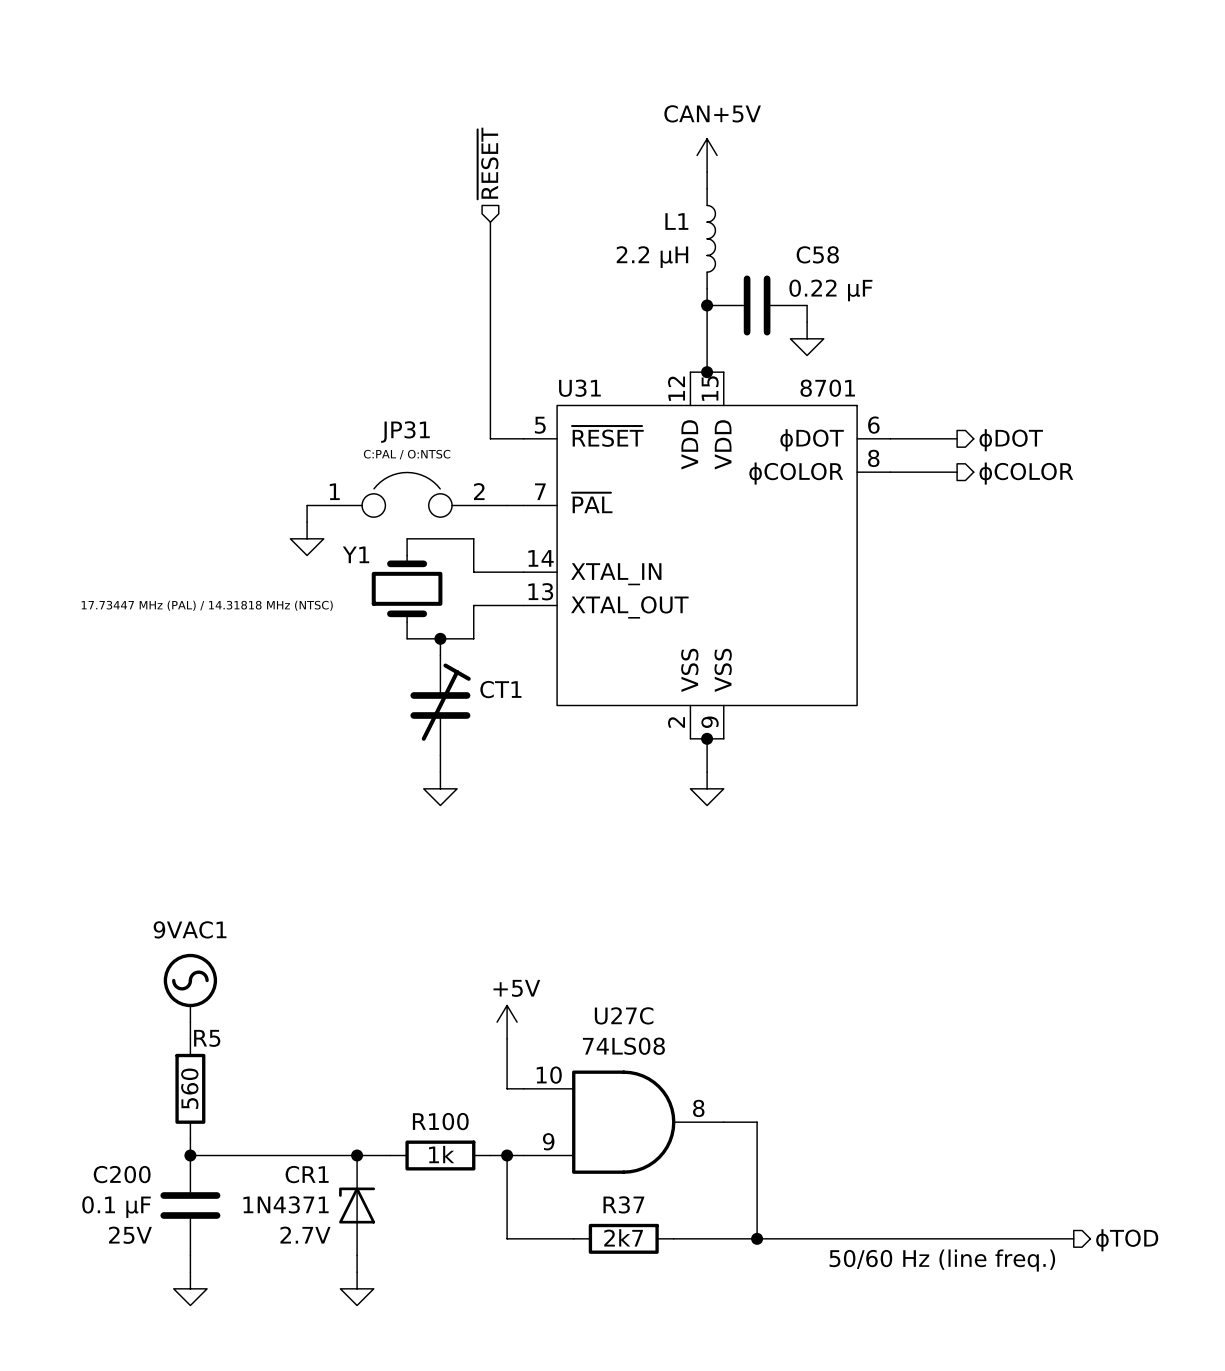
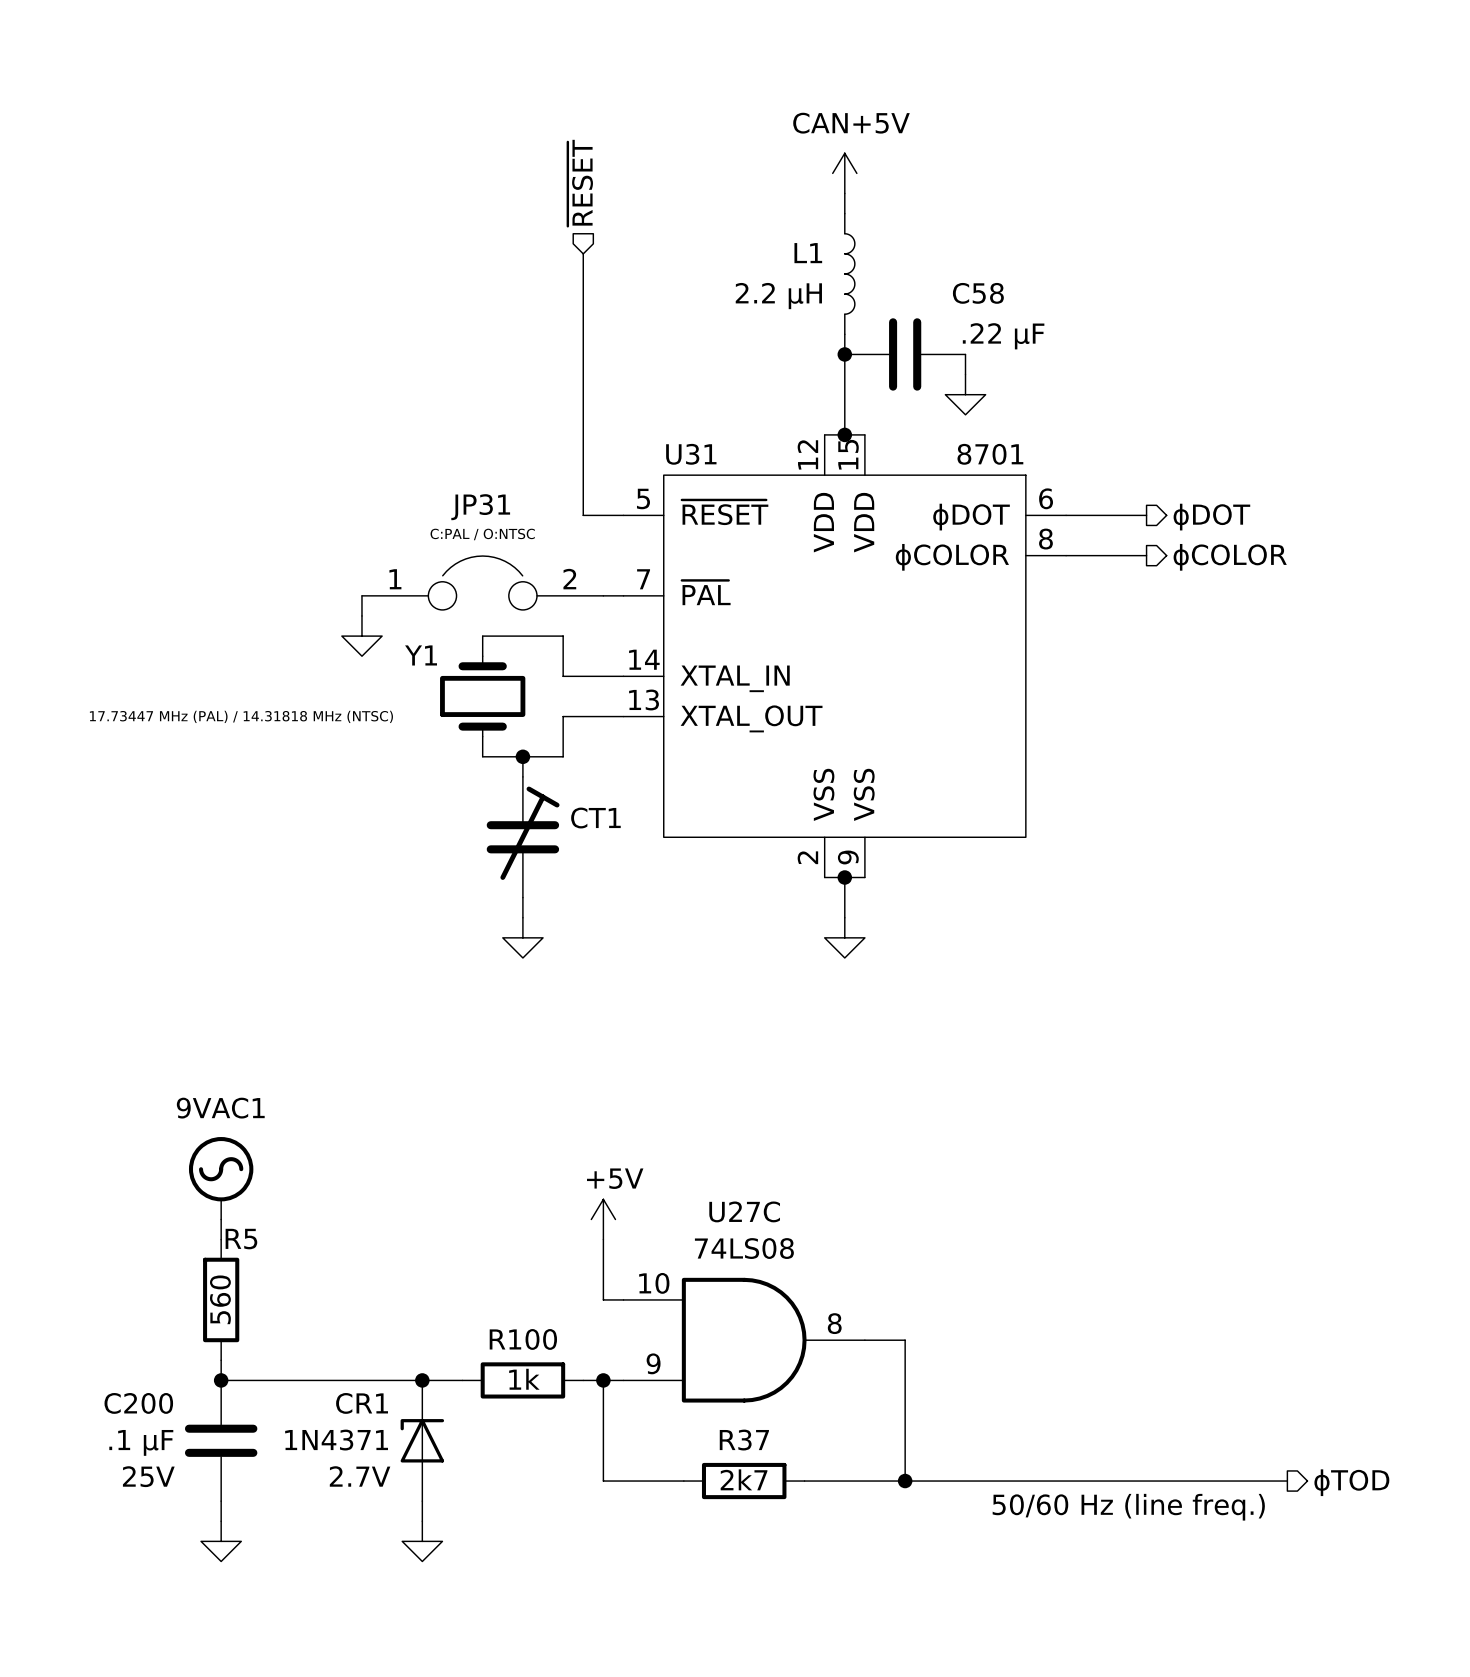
C58 value: 0.22 μF (830, 290) -> .22 μF (1003, 336)
C200 value: 0.1 μF (116, 1207) -> .1 μF (141, 1442)

